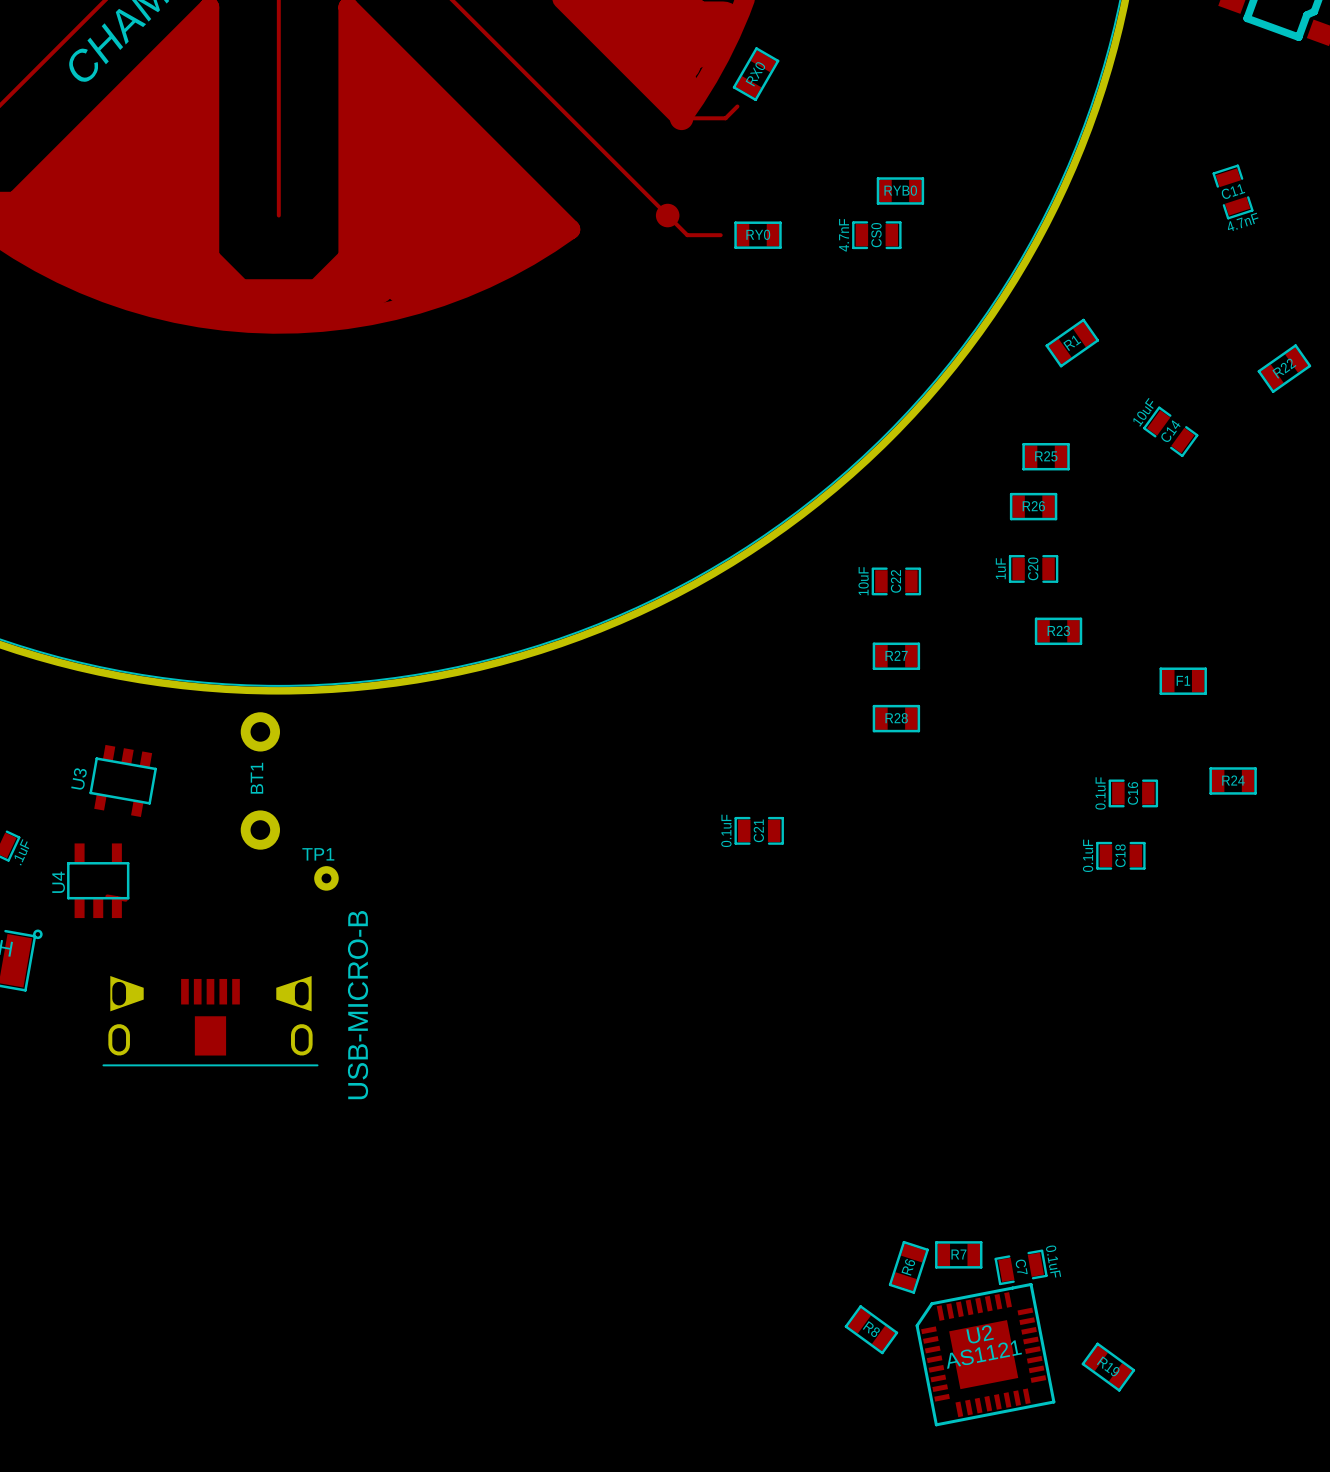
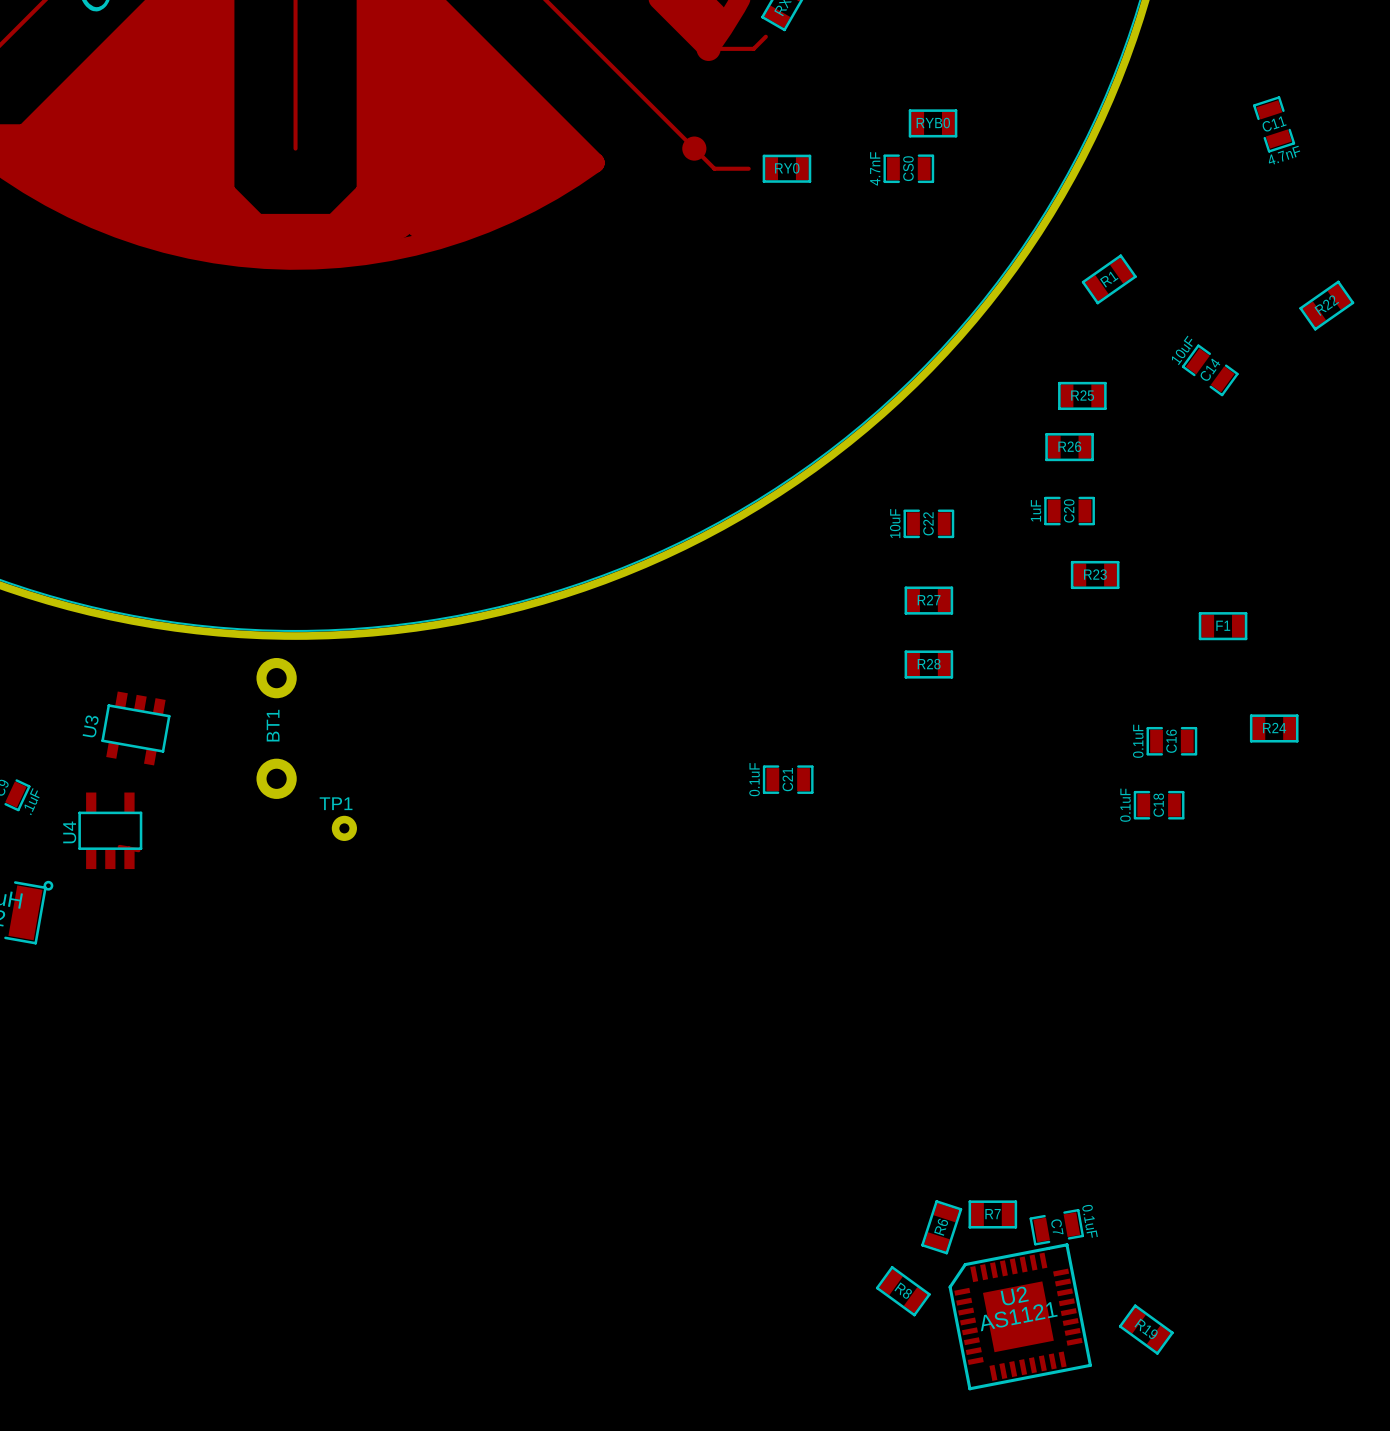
part: USB-MICRO-B (210, 1021) -> none

